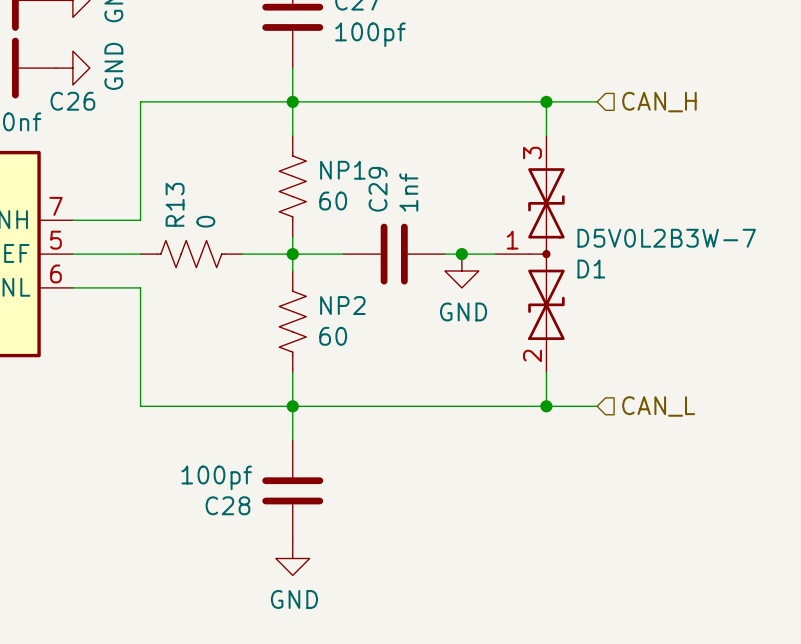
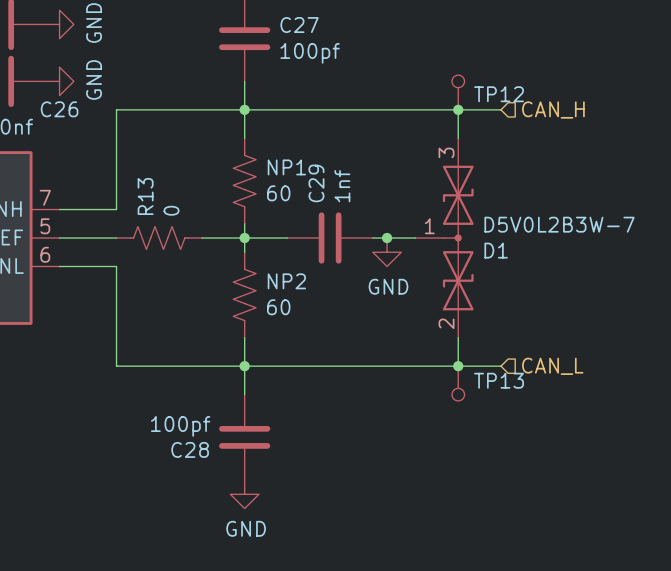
TP12: none -> (458, 92)
TP13: none -> (458, 383)

